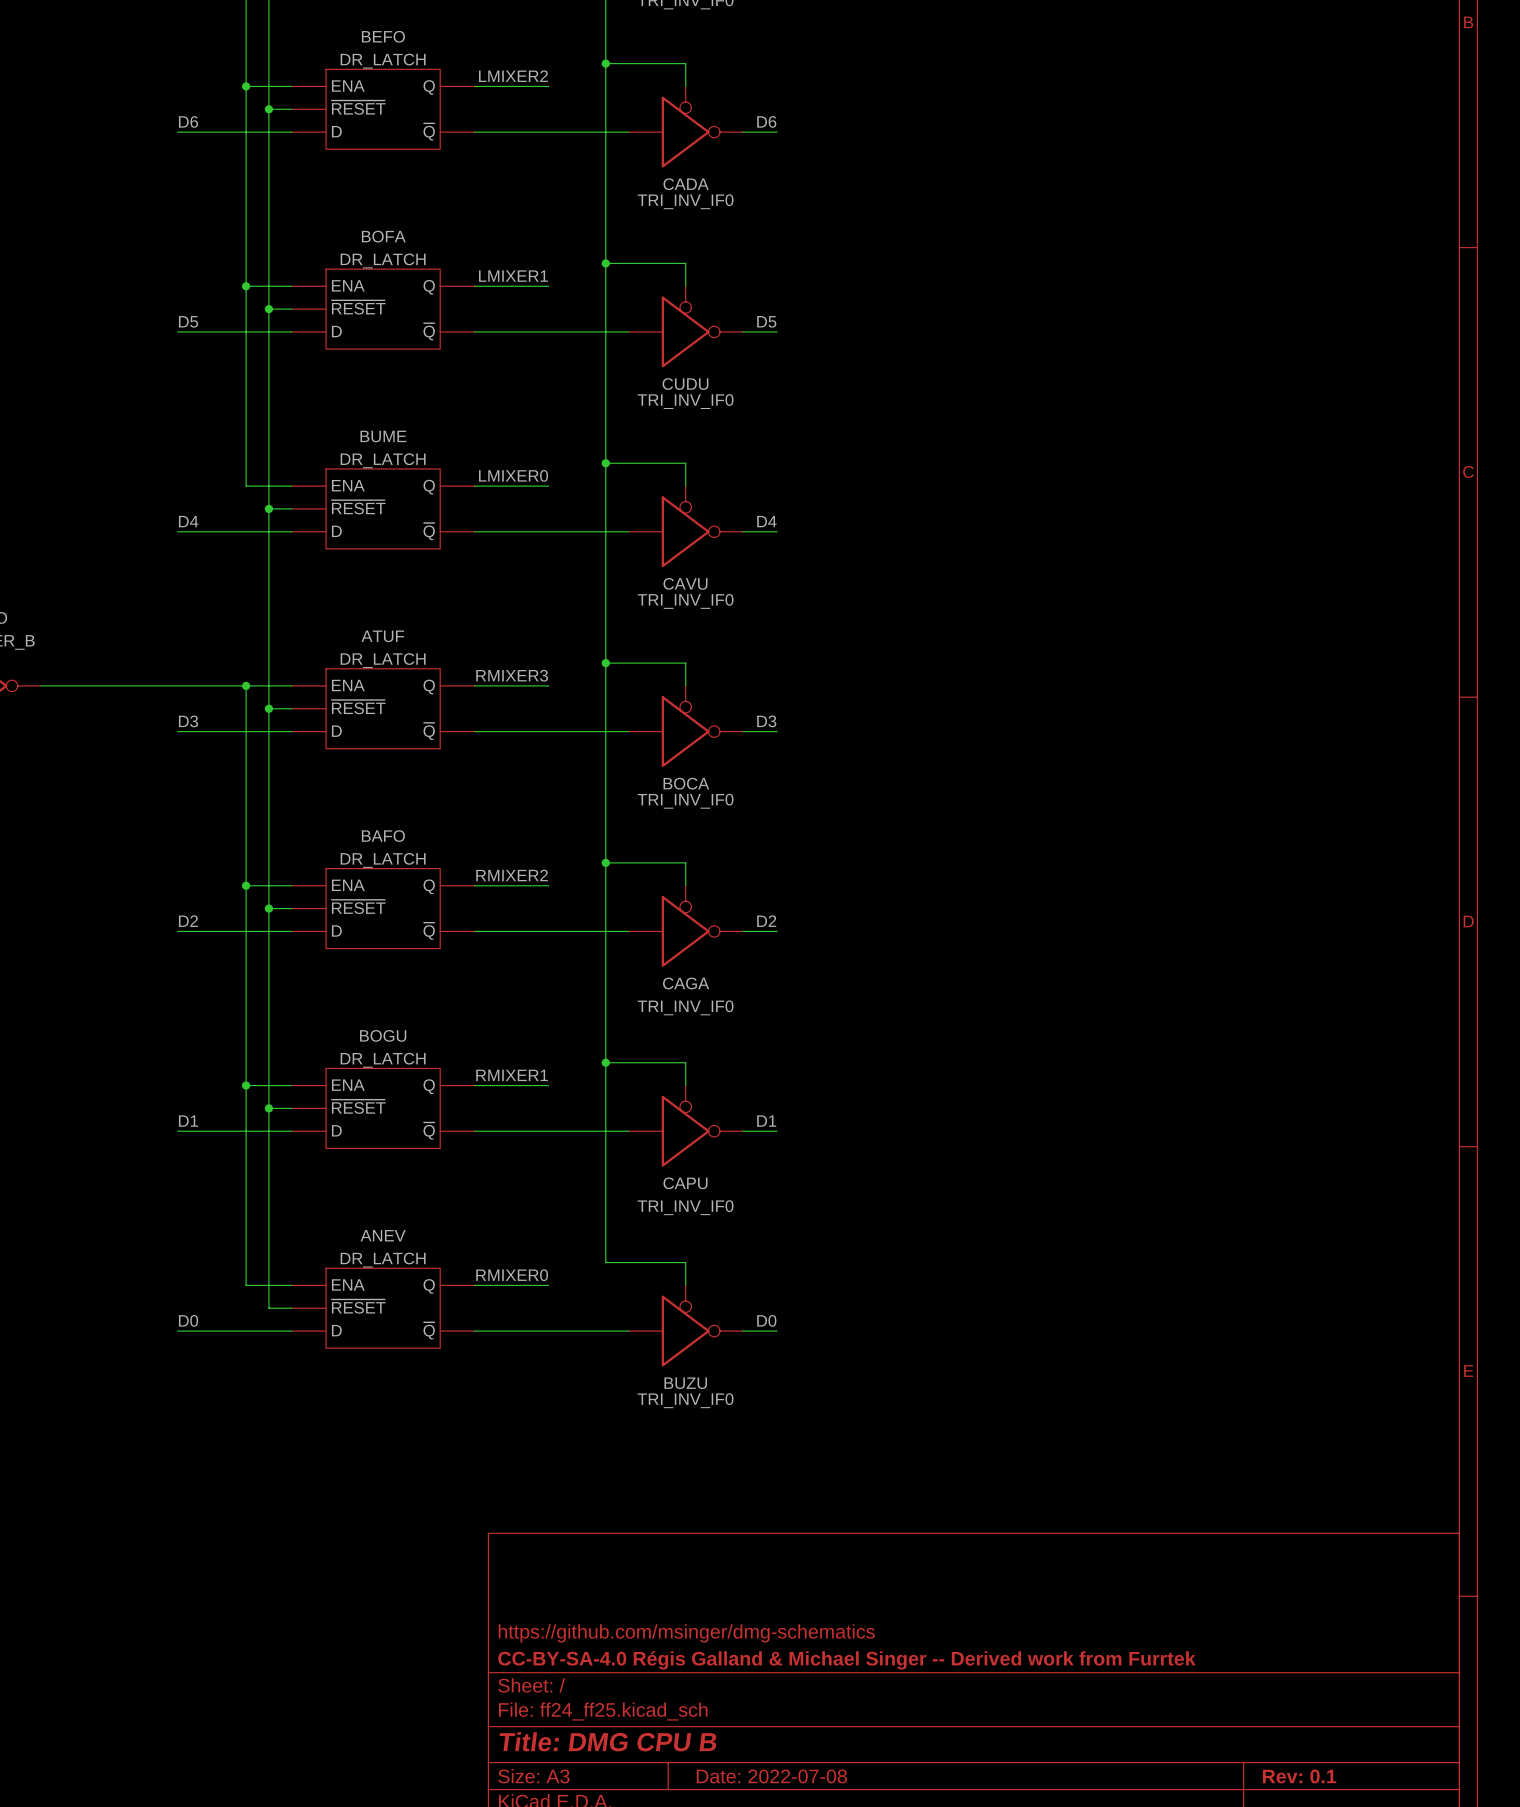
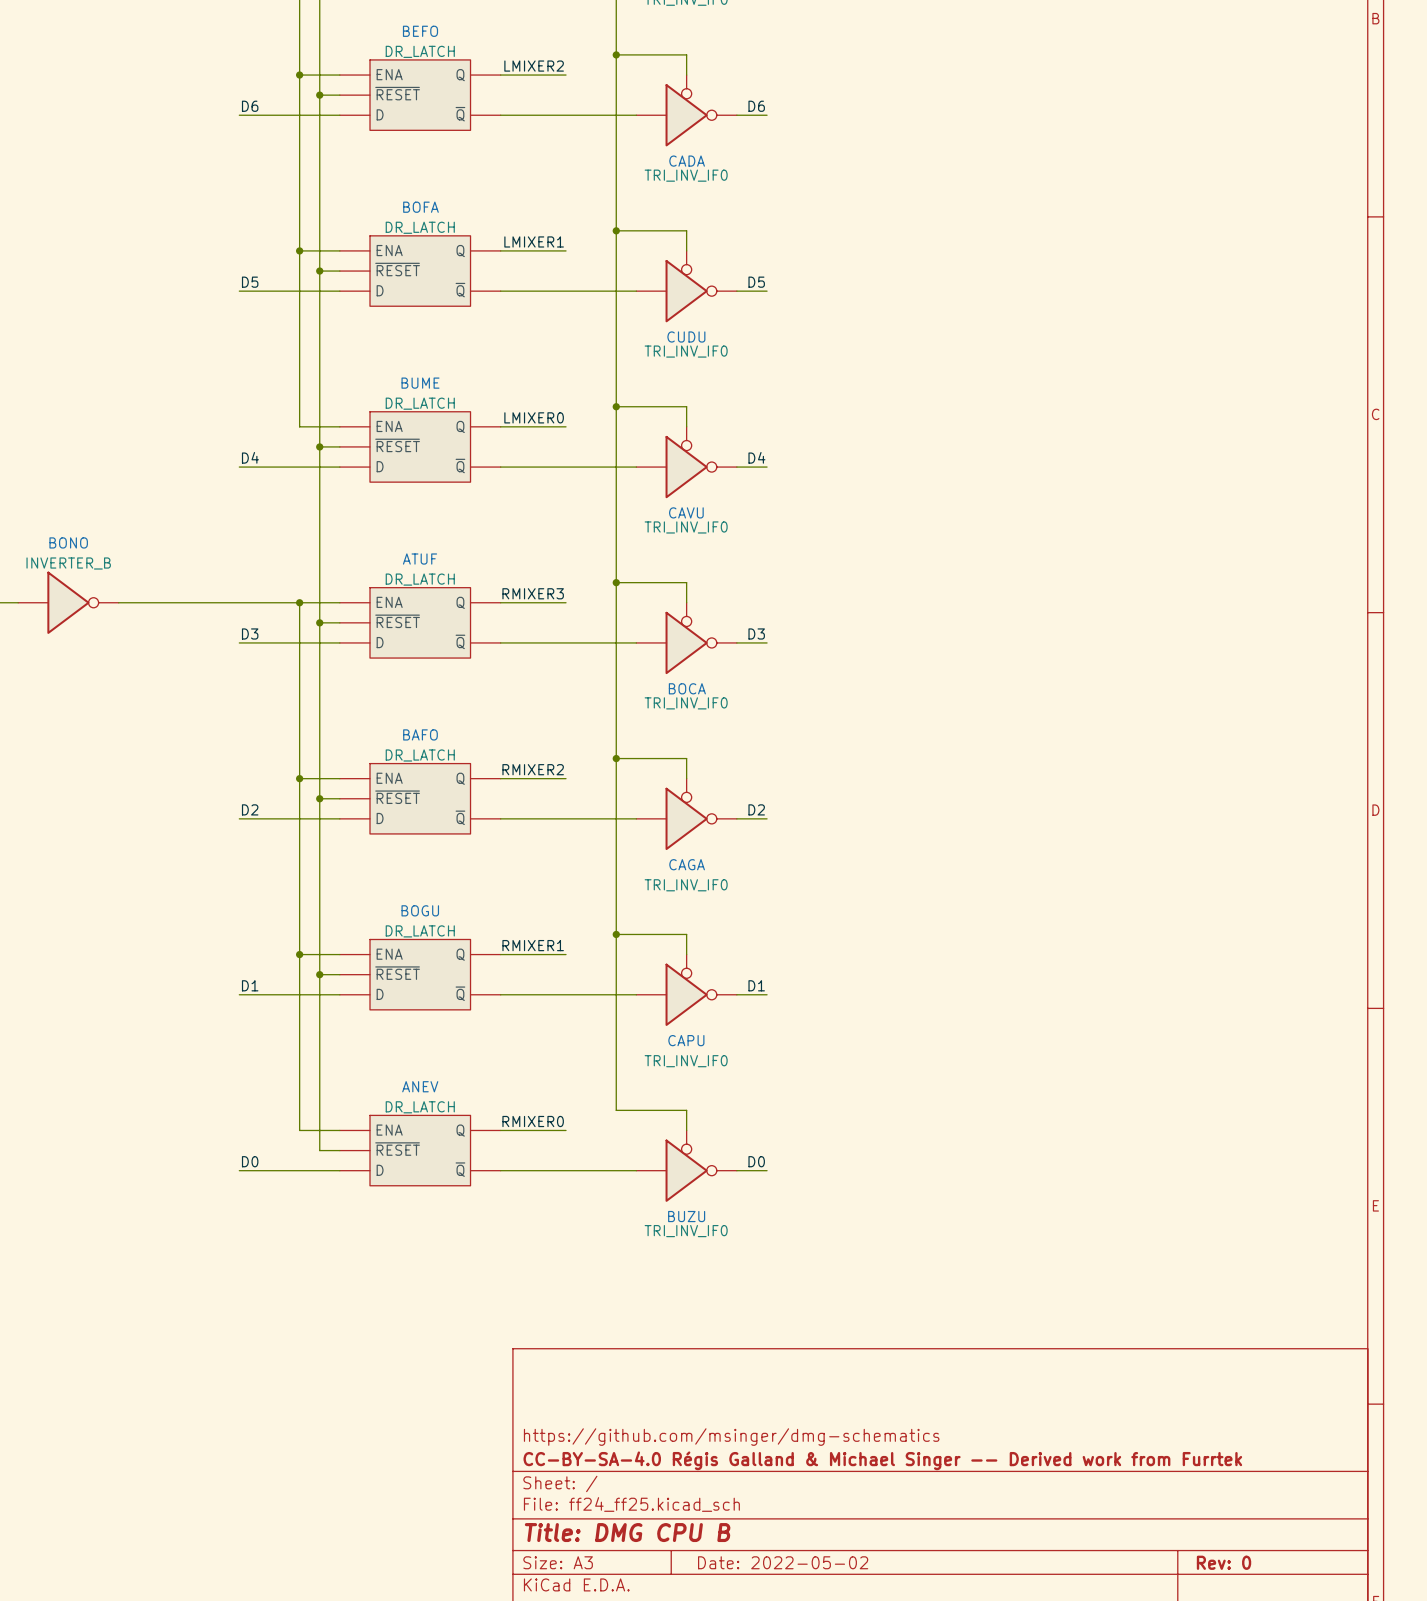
title block: Date: 2022-07-08 (771, 1776) -> Date: 2022-05-02 (783, 1562)
title block: Rev: 0.1 (1299, 1776) -> Rev: 0 (1224, 1562)

